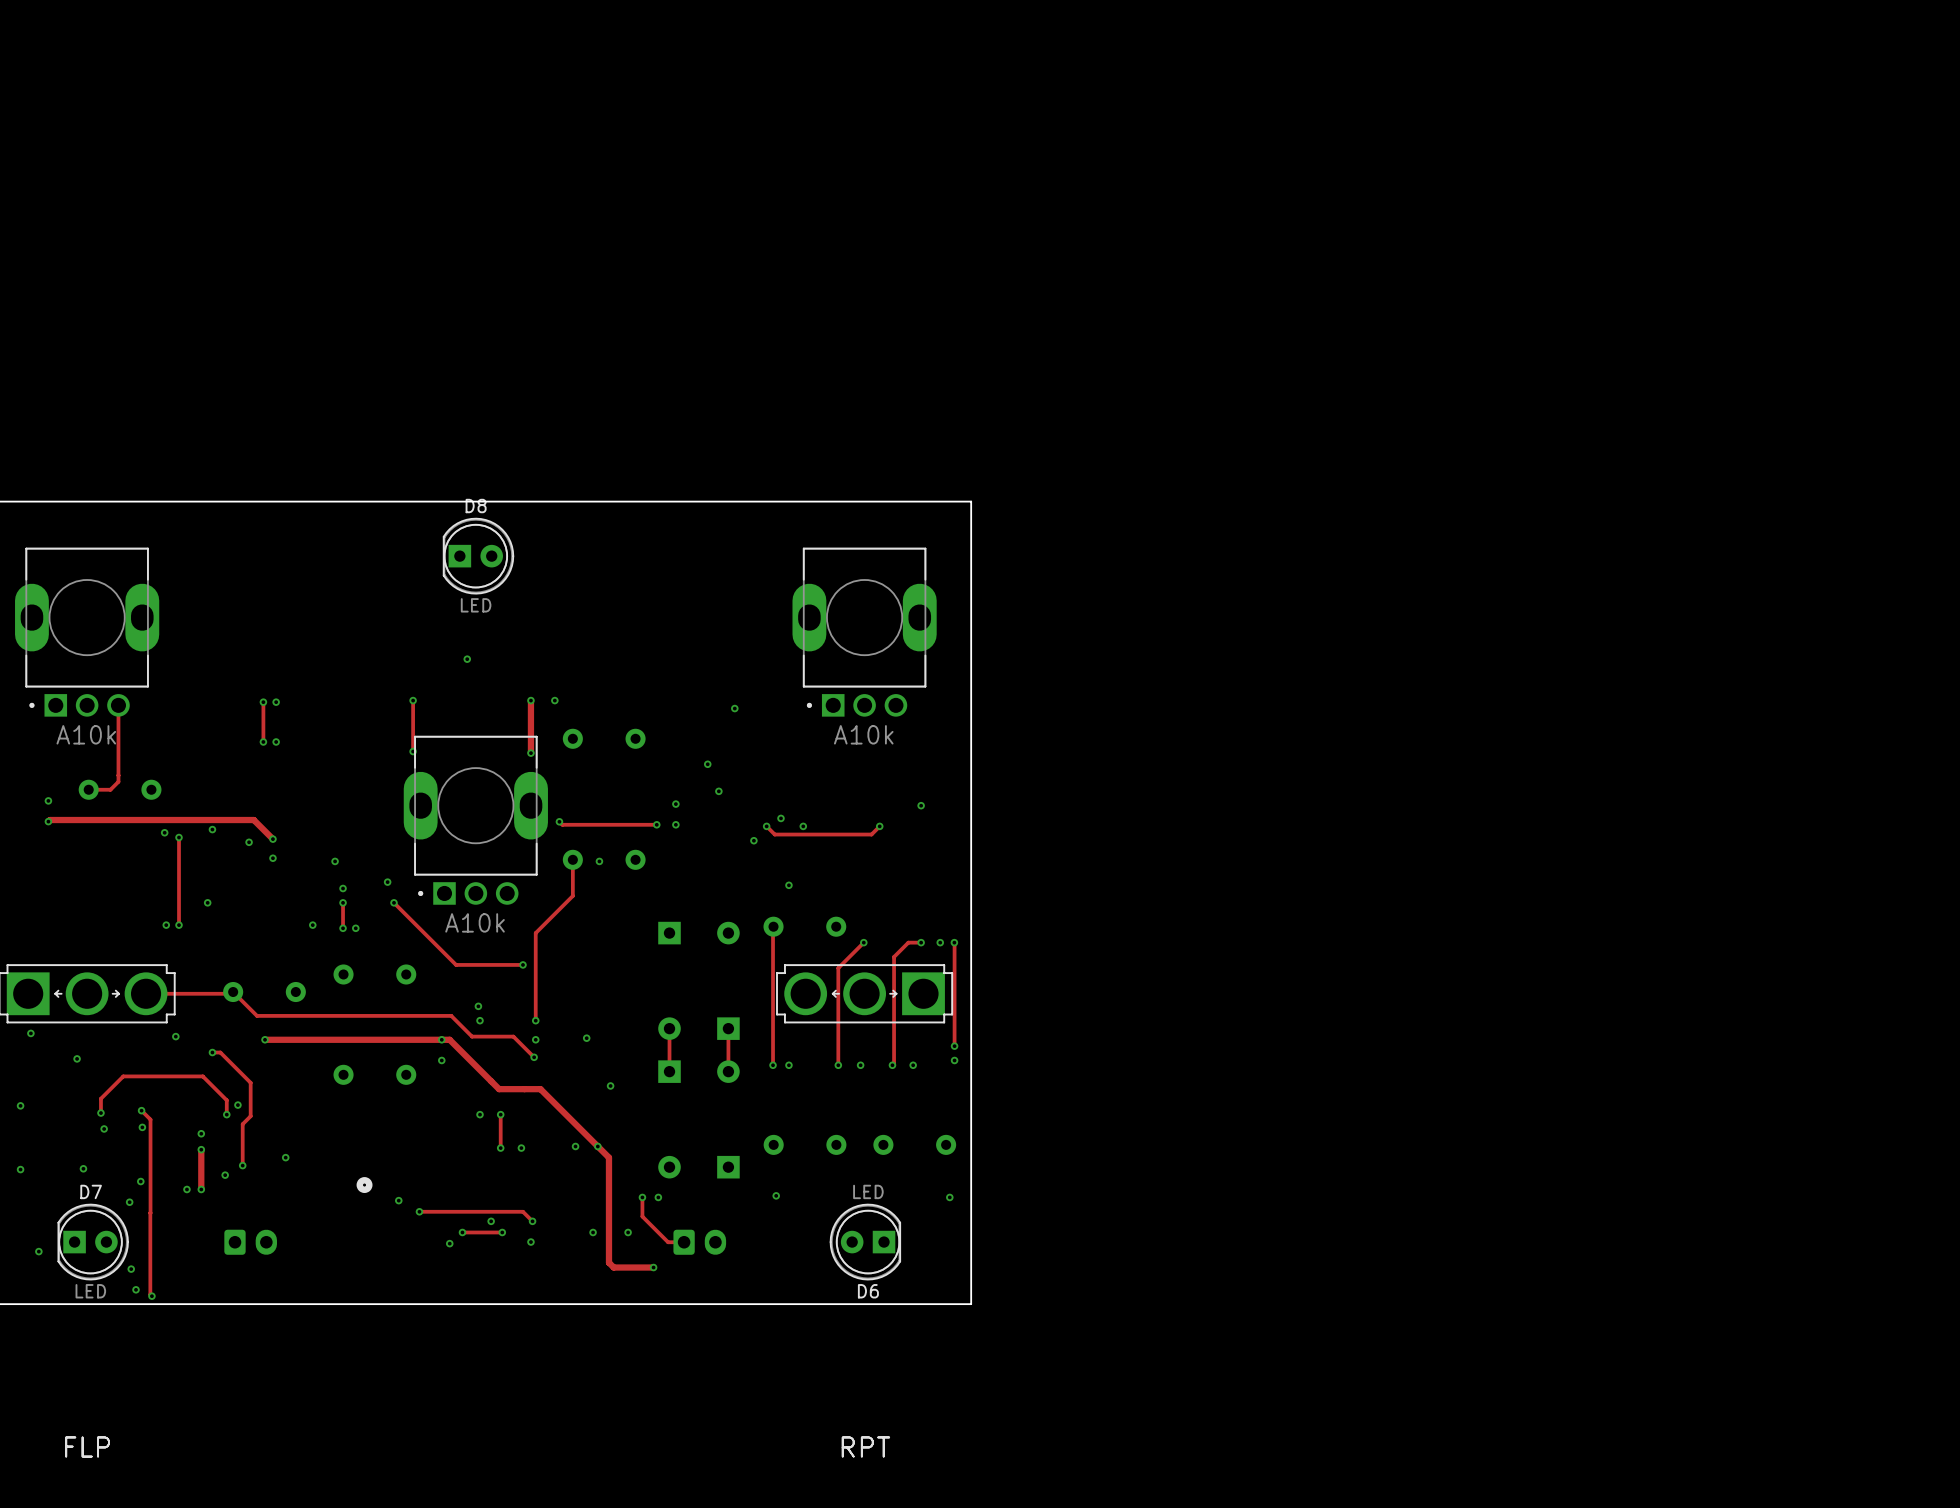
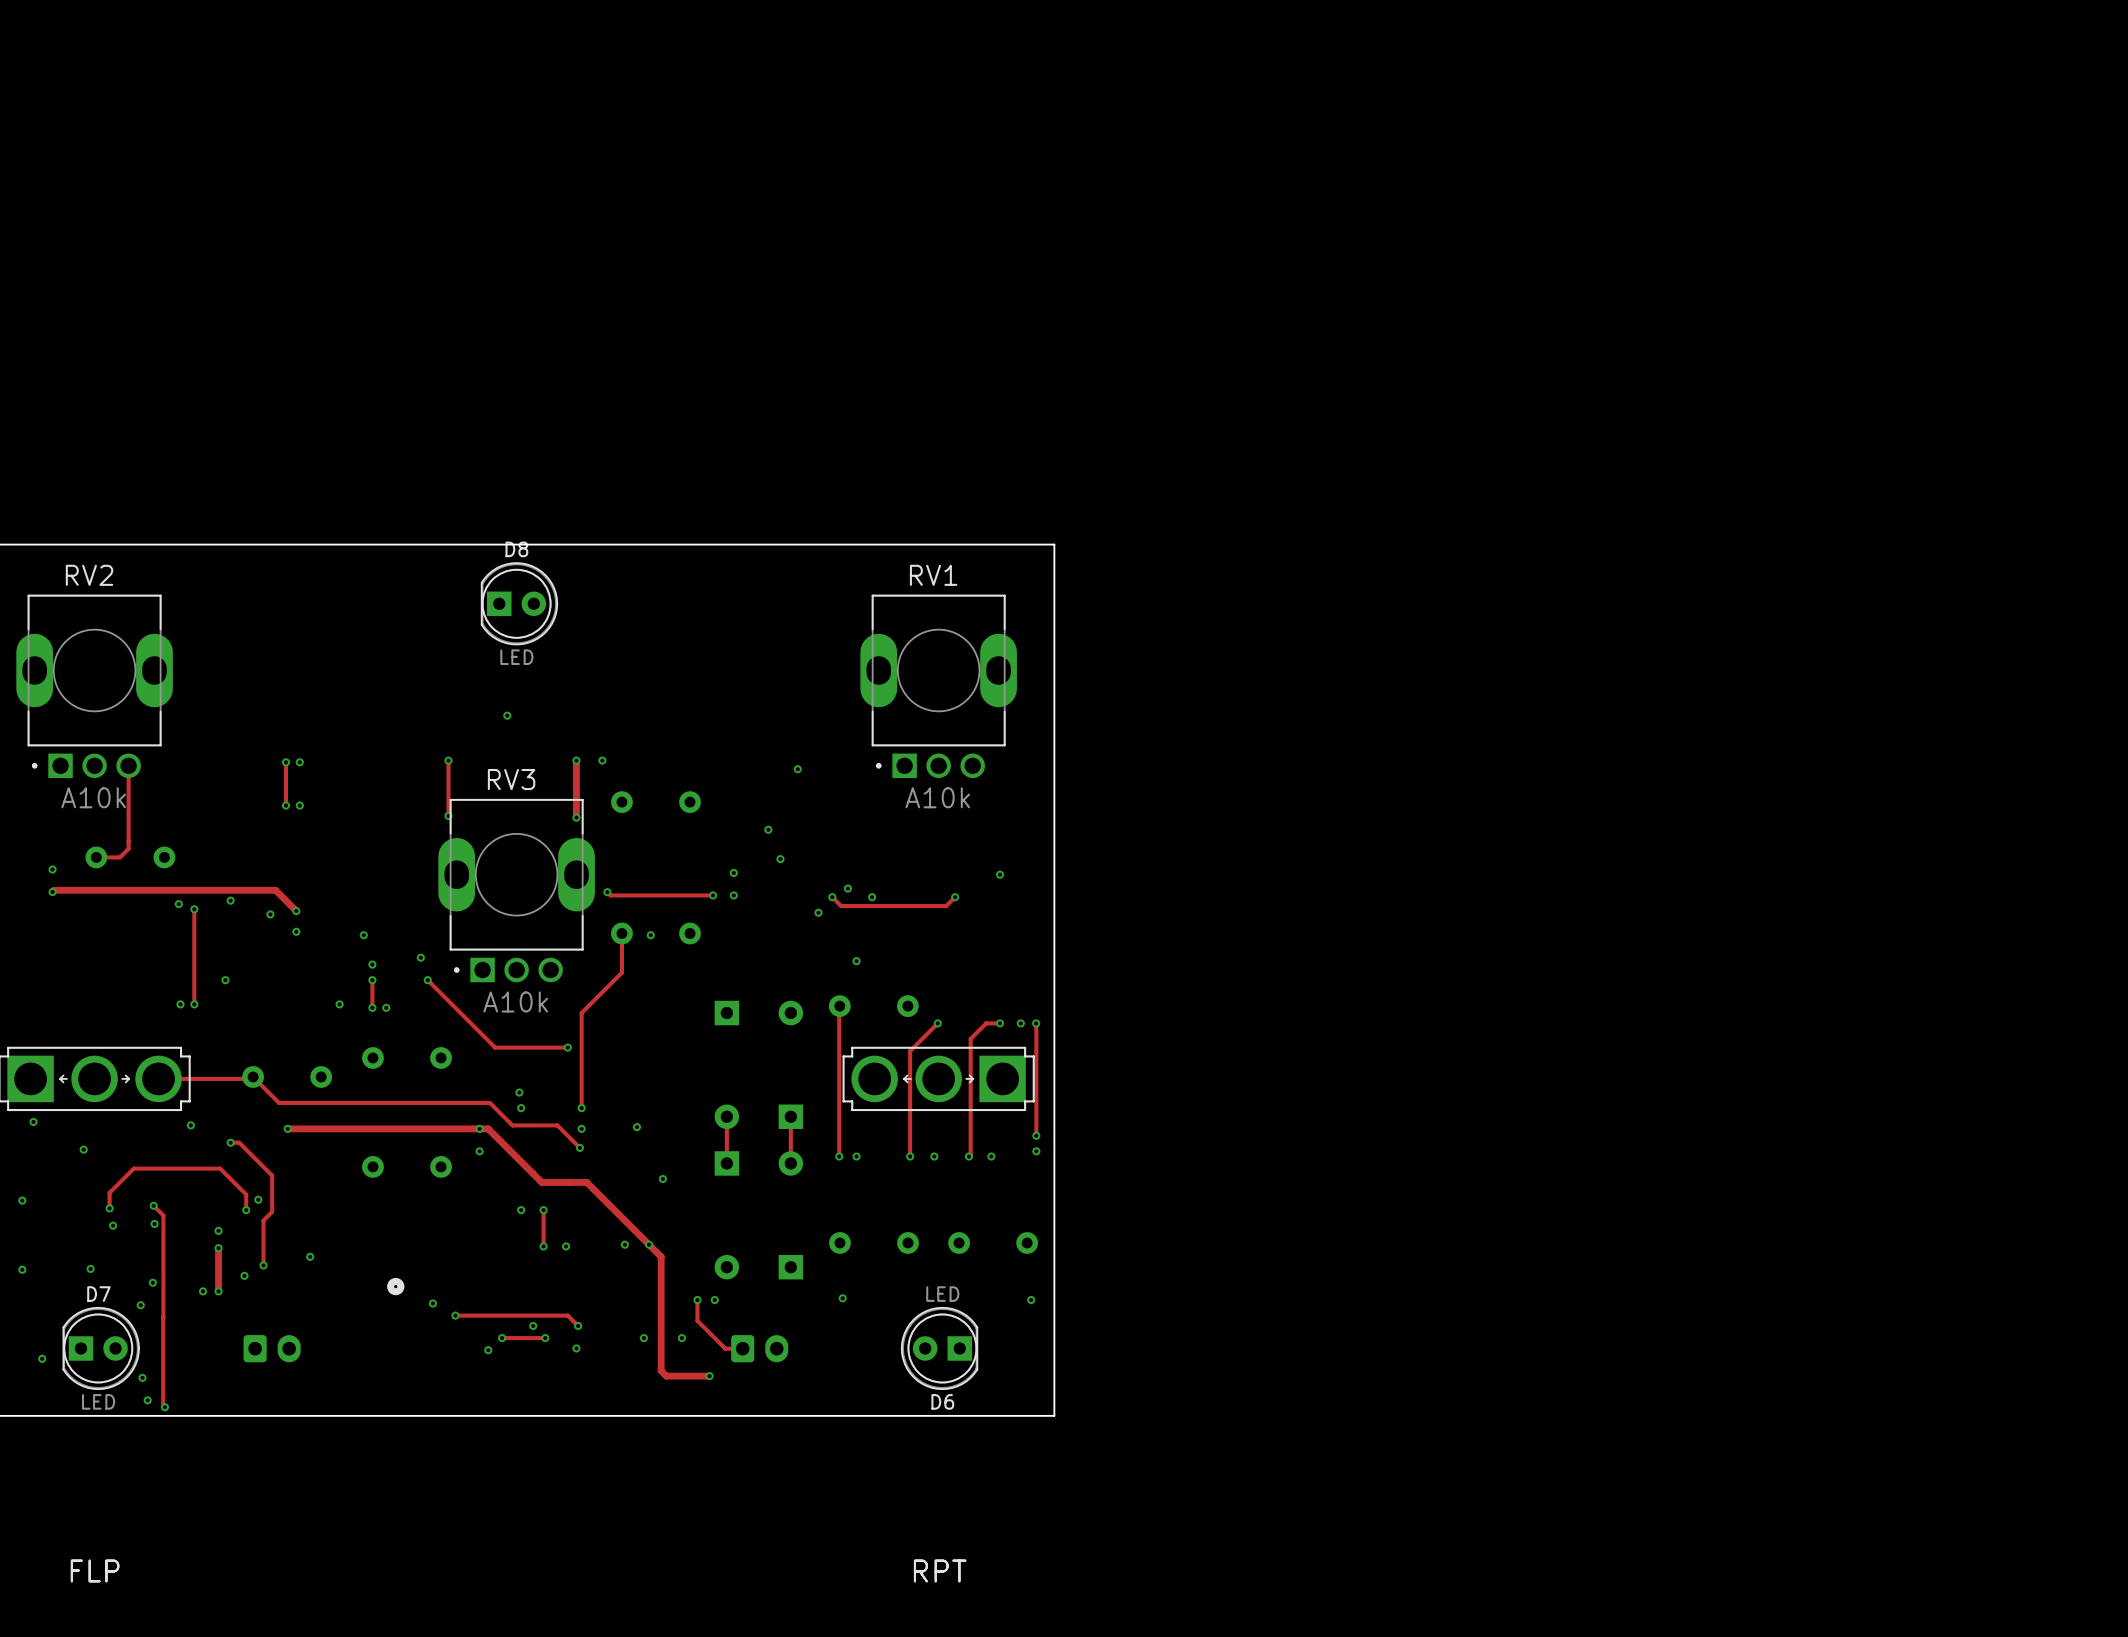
RV2 name: none -> RV2 (89, 575)
RV1 name: none -> RV1 (933, 575)
RV3 name: none -> RV3 (511, 779)

